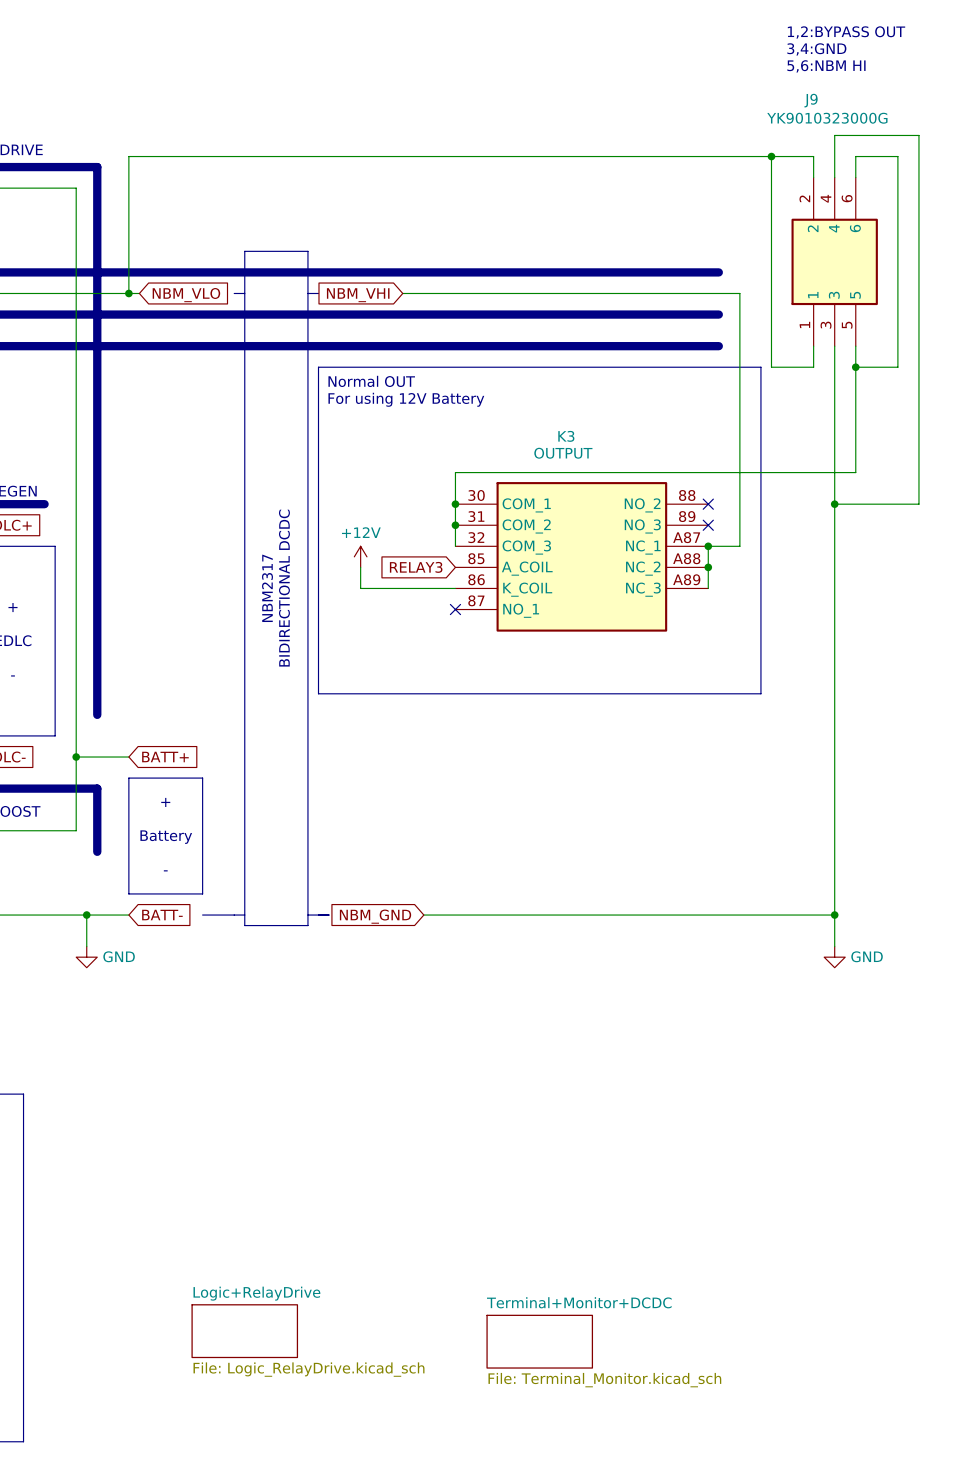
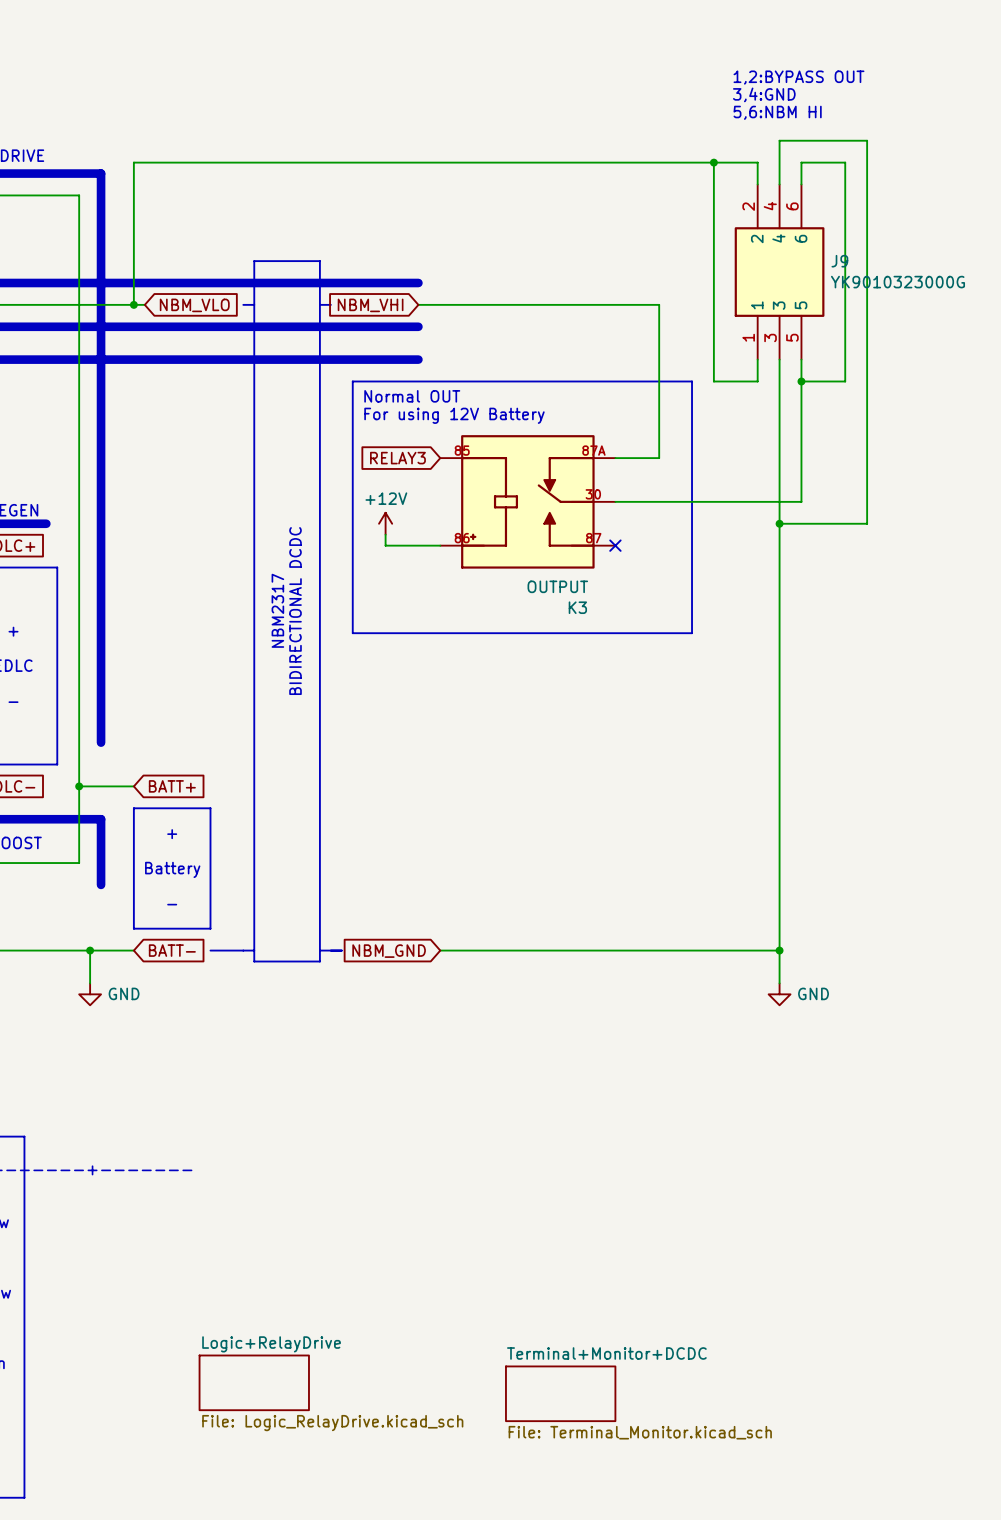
text position: 1,2:BYPASS OUT (846, 32) -> 1,2:BYPASS OUT (798, 77)
text position: 3,4:GND (816, 49) -> 3,4:GND (764, 94)
text position: 5,6:NBM HI (826, 66) -> 5,6:NBM HI (777, 112)
J9 name position: J9 (811, 100) -> J9 (839, 261)
J9 value position: YK9010323000G (827, 118) -> YK9010323000G (898, 282)
wire: (834, 135) (918, 135) (918, 504) (834, 504) (834, 946) -> (867, 140) (779, 140) (779, 184)
wire: none -> (713, 162) (713, 381) (757, 381) (757, 359)
junction: none -> (713, 162)
wire: (729, 156) (771, 156) -> (757, 162) (757, 184)
junction: (771, 156) -> none
wire: (855, 177) (855, 156) (897, 156) (897, 367) (855, 367) -> none
J9 position: (834, 261) -> (779, 272)
line: (402, 272) (718, 272) -> none
wire: (634, 293) (739, 293) (739, 546) (708, 546) (708, 588) -> (659, 304) (659, 458) (615, 458)
line: (402, 314) (718, 314) -> none
line: (402, 346) (718, 346) -> none
wire: none -> (779, 359) (779, 983)
wire: (855, 346) (855, 472) (455, 472) (455, 546) -> none
line: (339, 367) (318, 367) (318, 693) (760, 693) (760, 367) (666, 367) -> (352, 381) (352, 633) (692, 633) (692, 381)
wire: none -> (801, 381) (801, 501) (615, 501)
junction: none -> (801, 381)
junction: (855, 367) -> none
text position: Normal OUT (371, 381) -> Normal OUT (412, 396)
text position: For using 12V Battery (406, 399) -> For using 12V Battery (454, 415)
K3 name position: K3 (566, 436) -> K3 (577, 607)
K3 value position: OUTPUT (563, 453) -> OUTPUT (557, 586)
K3 symbol: [455, 482, 709, 632] -> [440, 435, 616, 569]
junction: (455, 504) -> none
no-connect mark: (708, 504) -> none
wire: none -> (779, 523) (867, 523)
junction: none -> (779, 523)
junction: (834, 504) -> none
wire: none -> (385, 534) (385, 545) (440, 545)
junction: (455, 525) -> none
no-connect mark: none -> (615, 545)
no-connect mark: (708, 525) -> none
junction: (708, 546) -> none
power symbol position: +12V (360, 556) -> +12V (385, 523)
wire: (360, 567) (360, 588) (455, 588) -> none
global label position: RELAY3 (416, 567) -> RELAY3 (397, 458)
junction: (708, 567) -> none
no-connect mark: (455, 609) -> none
wire: (750, 915) (834, 915) -> none
junction: none -> (779, 950)
junction: (834, 915) -> none
power symbol position: GND (834, 957) -> GND (779, 994)

